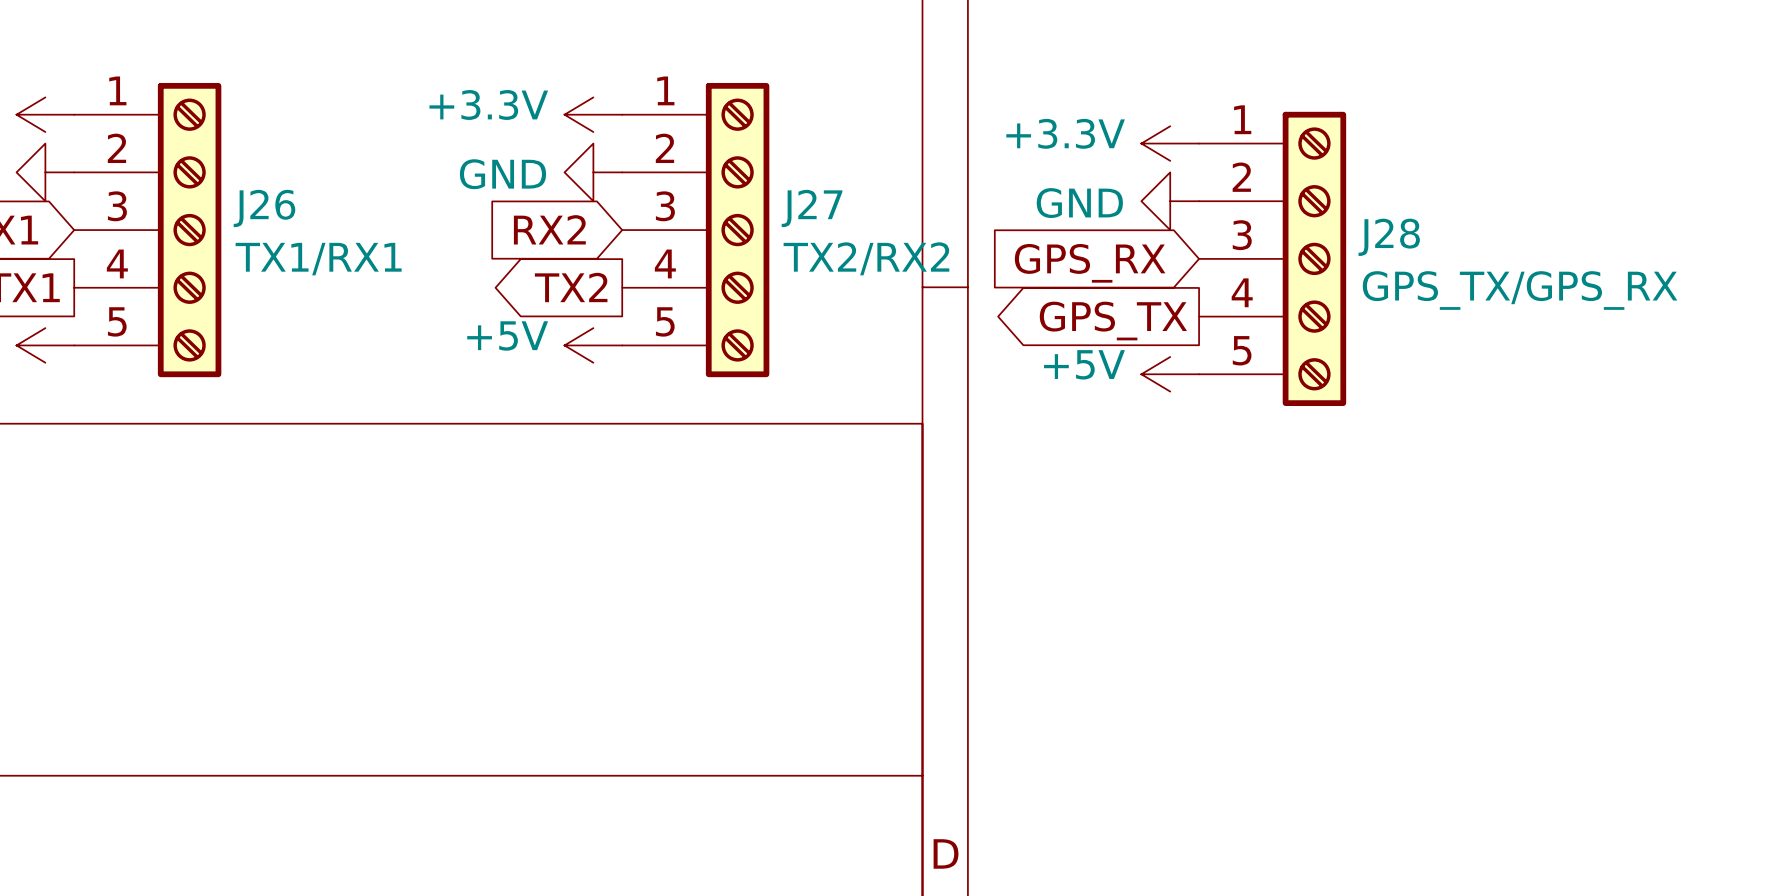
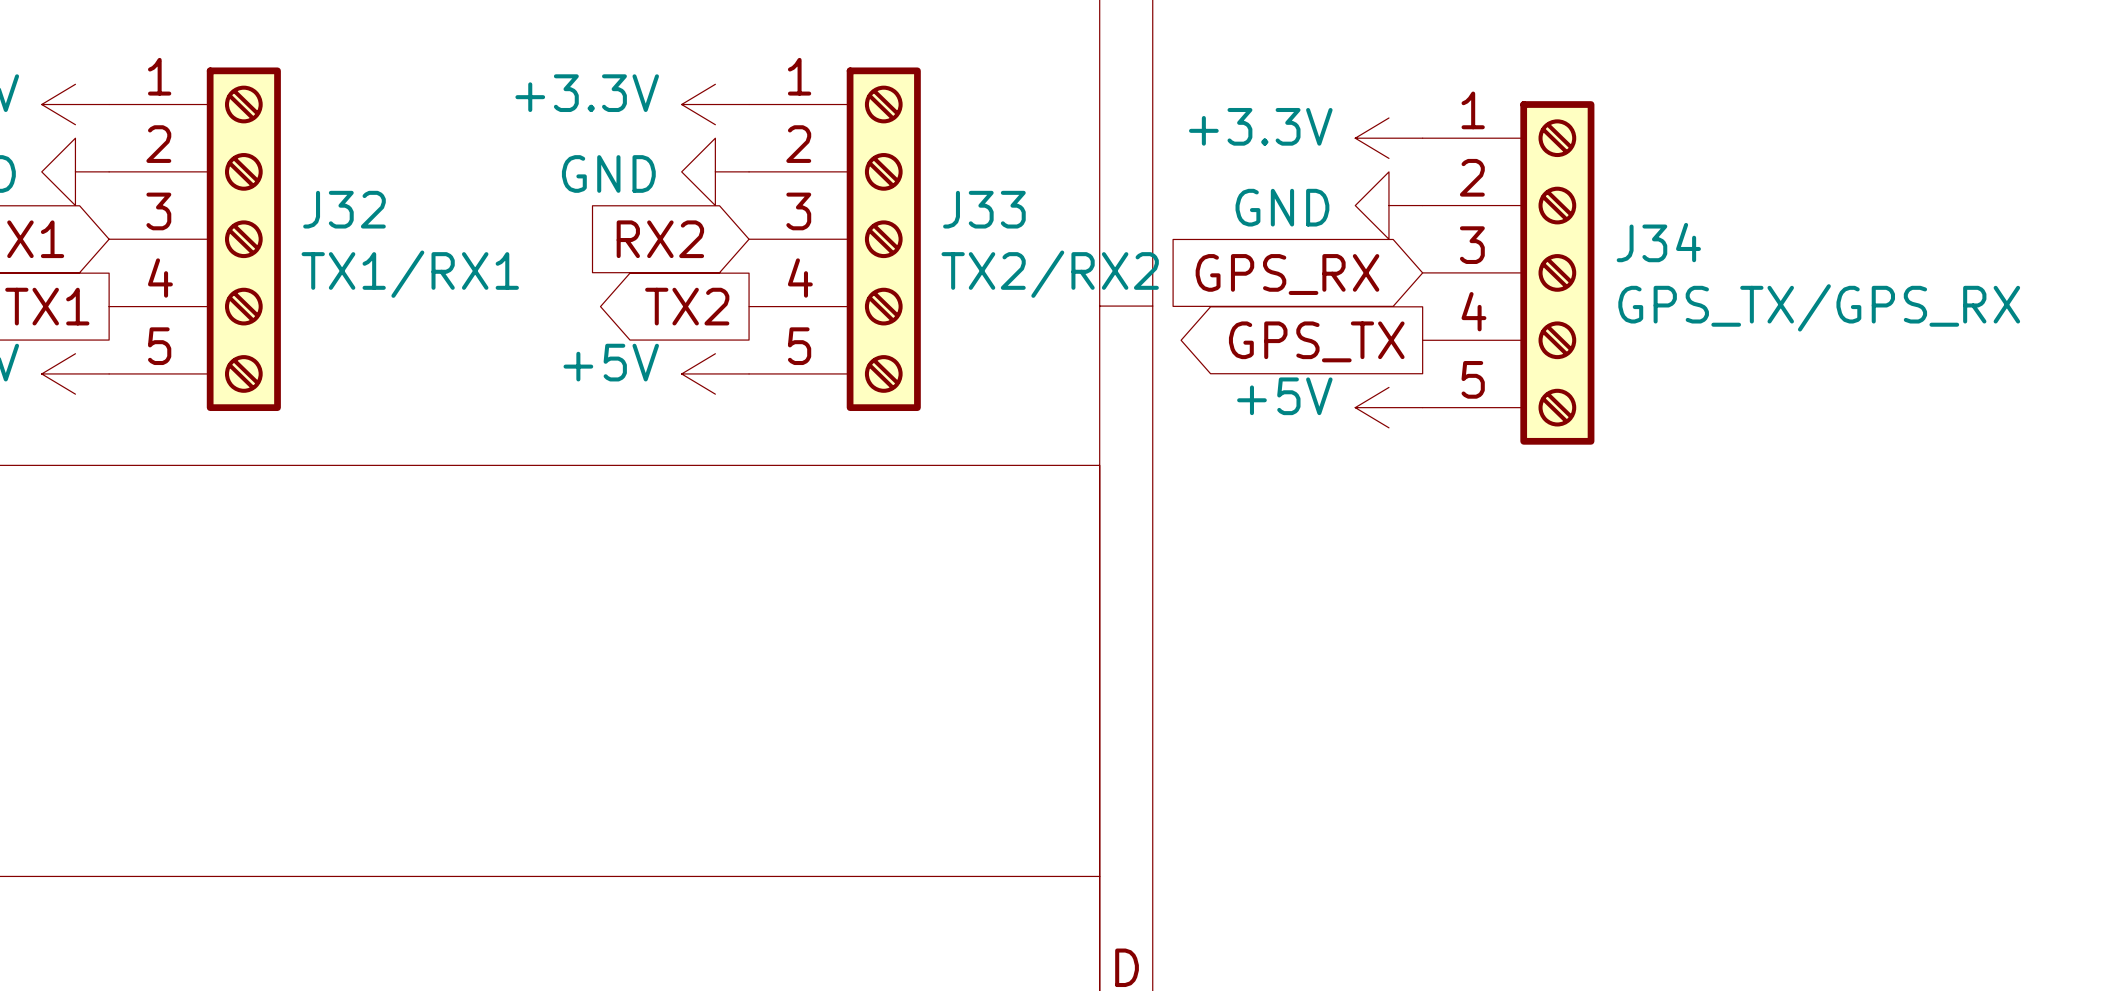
J26 name: J26 (264, 208) -> J32 (344, 209)
J27 name: J27 (812, 208) -> J33 (984, 209)
J28 name: J28 (1389, 237) -> J34 (1658, 242)

